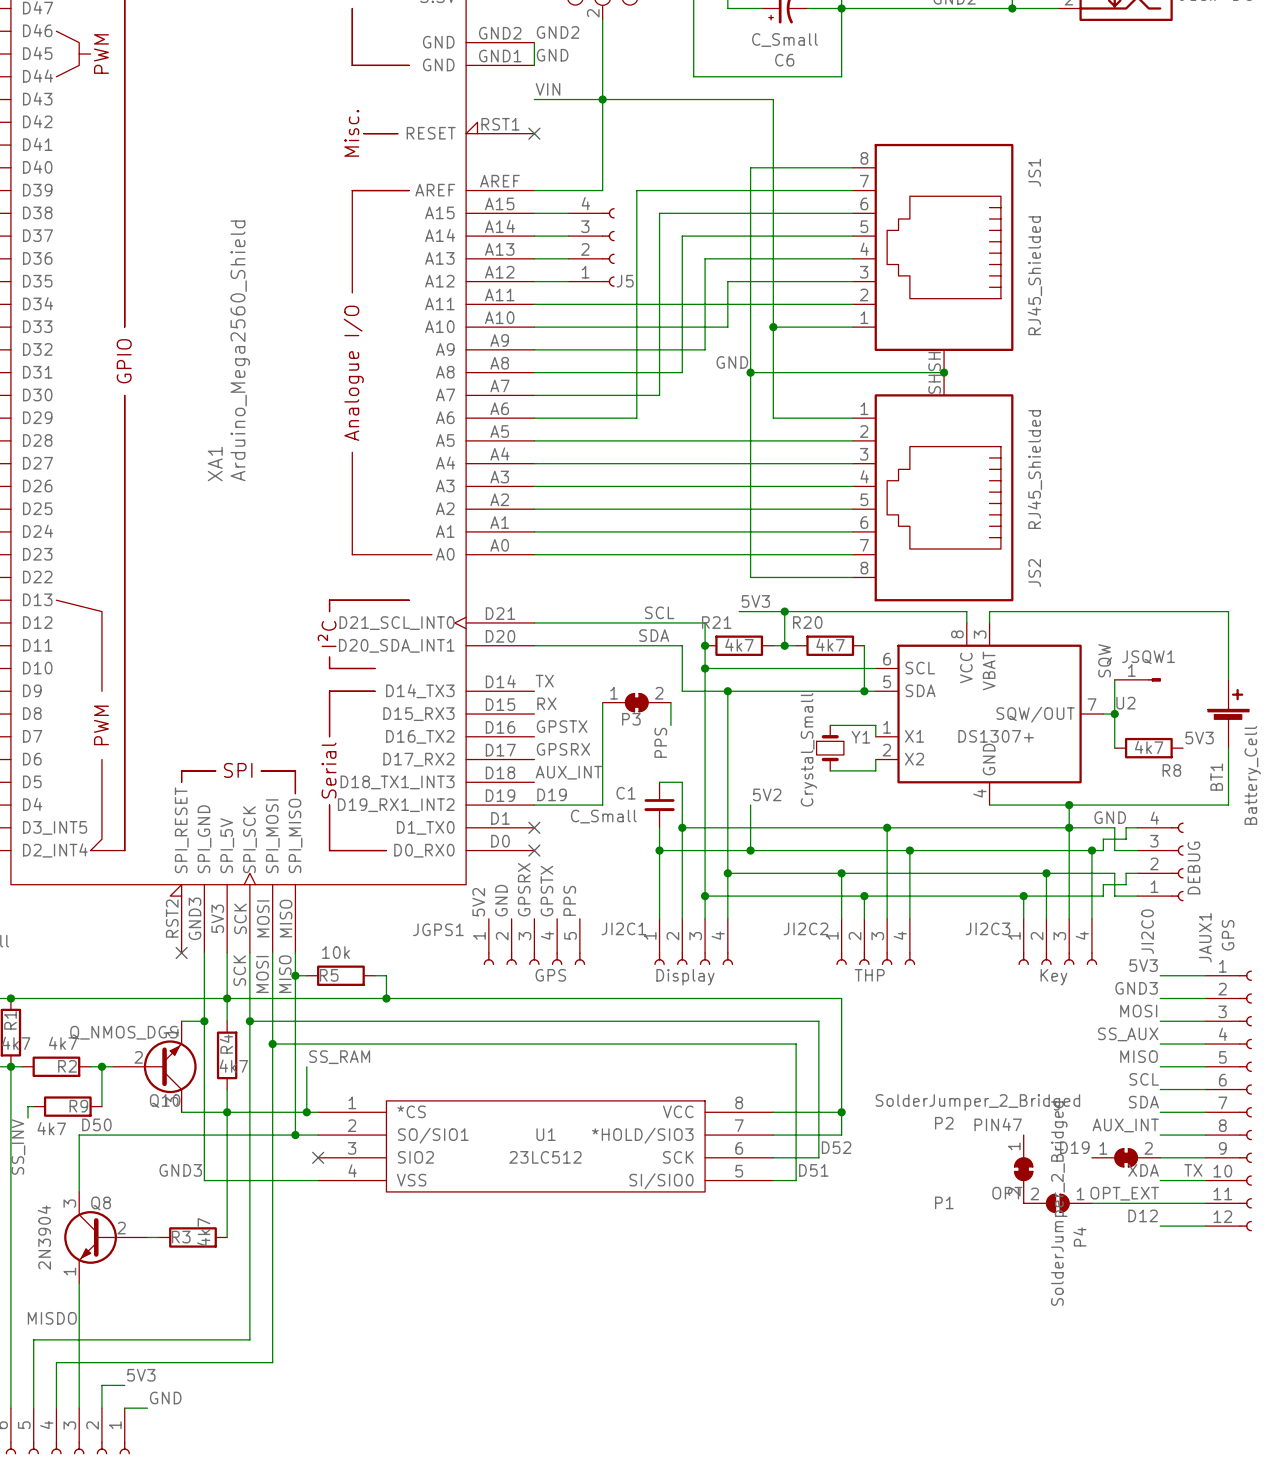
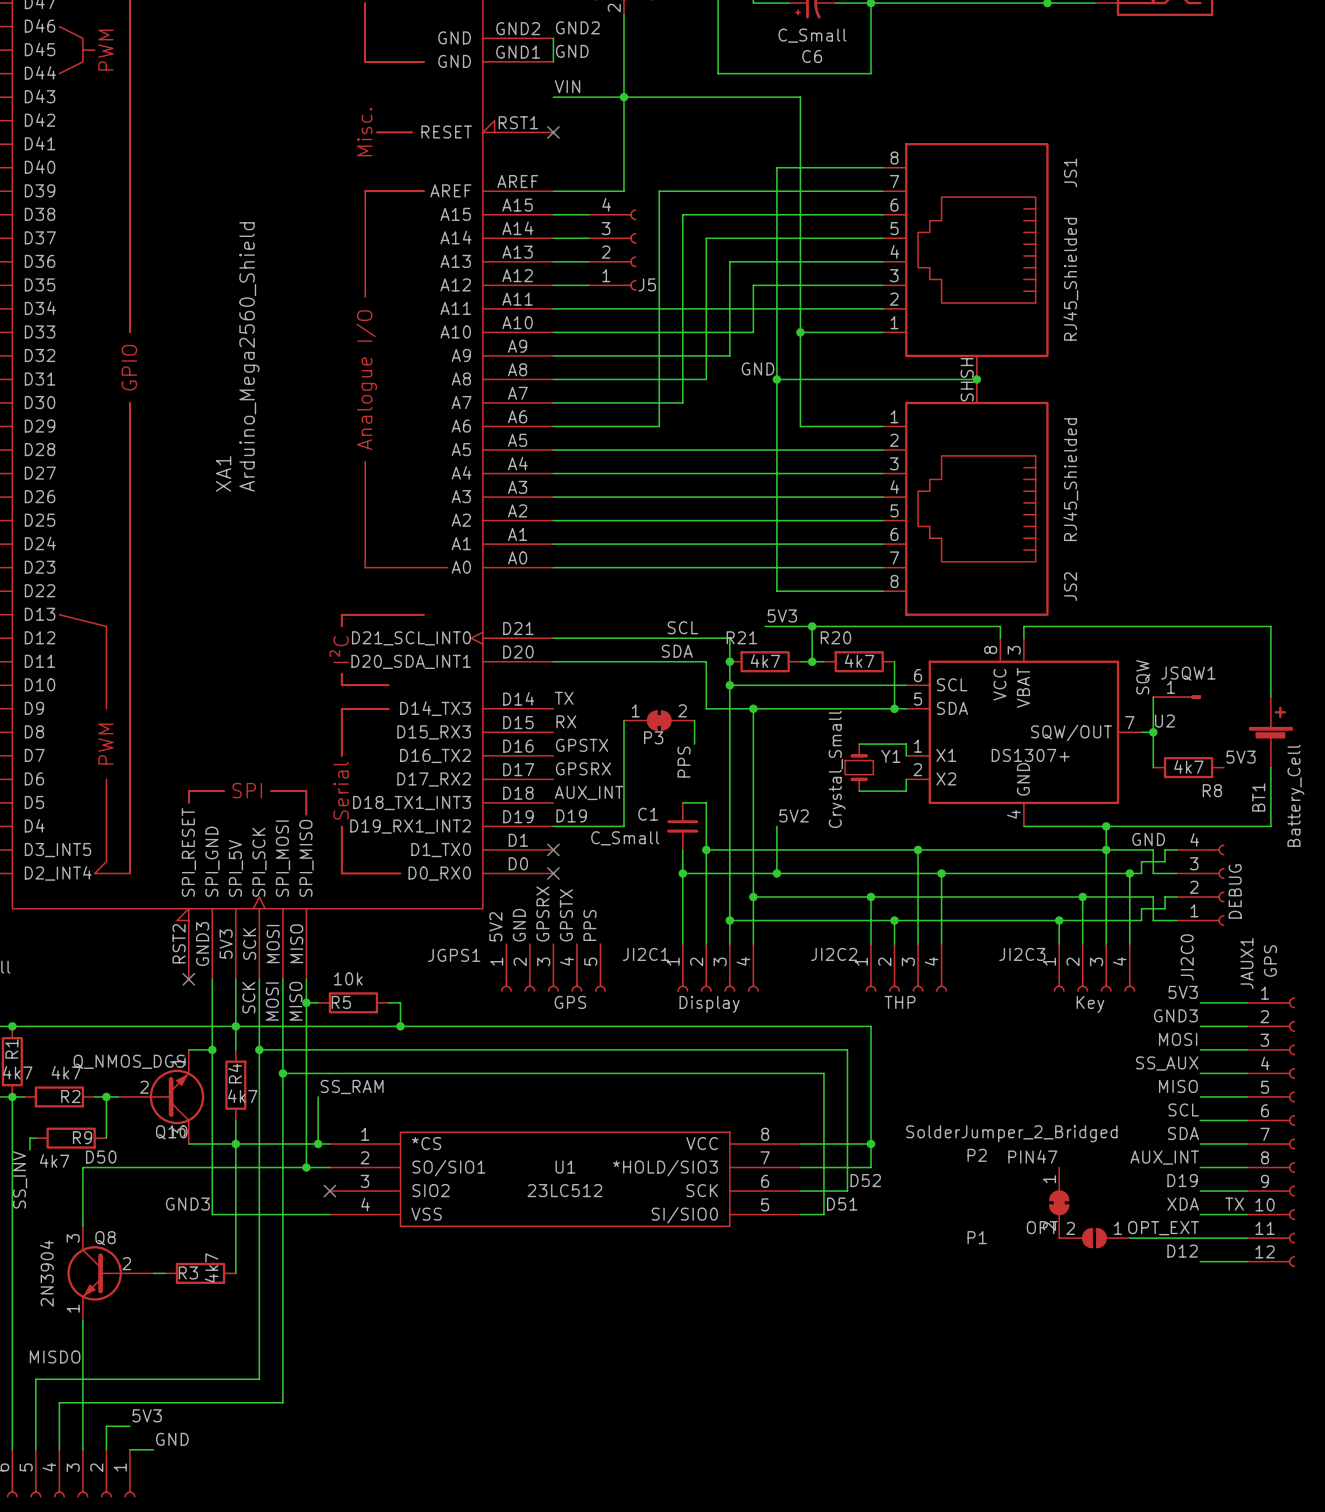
label position: D19 (1074, 1147) -> D19 (1182, 1180)
P4: SolderJumper_2_Bridged (1126, 1157) -> none

